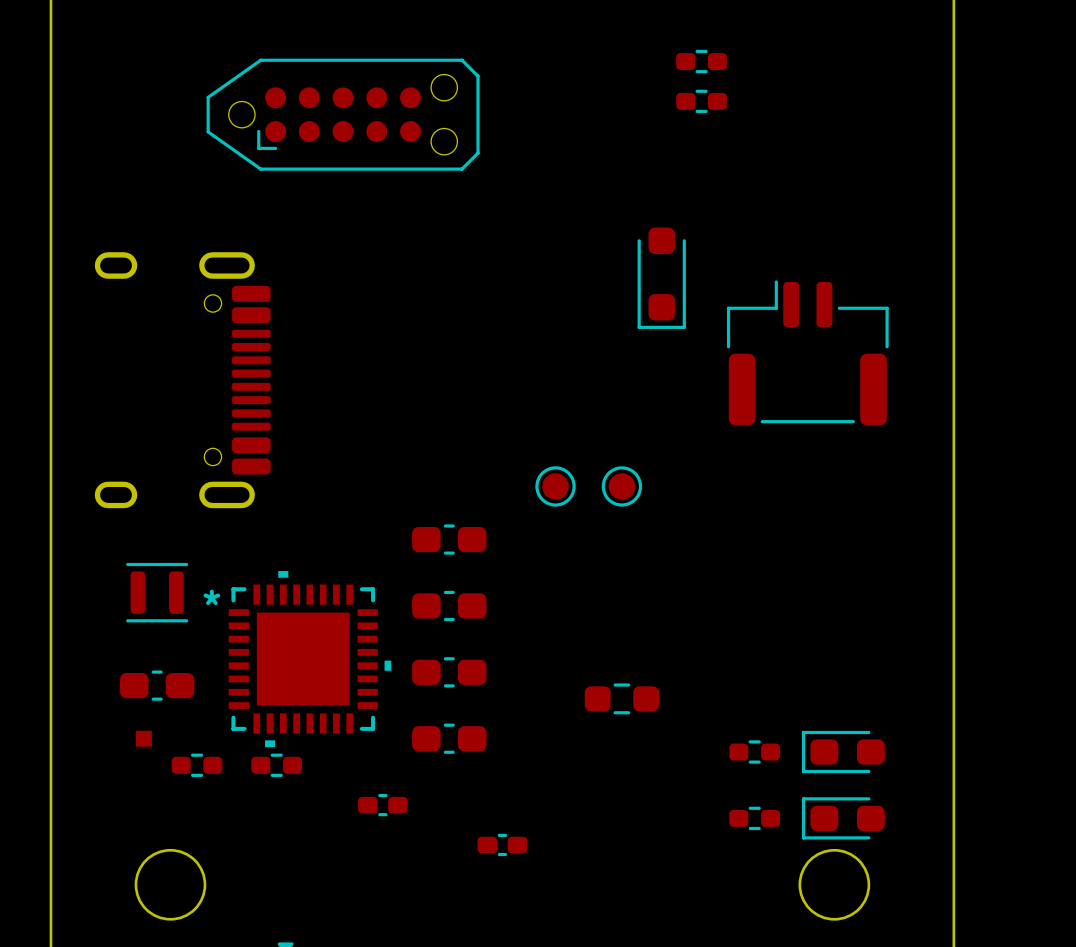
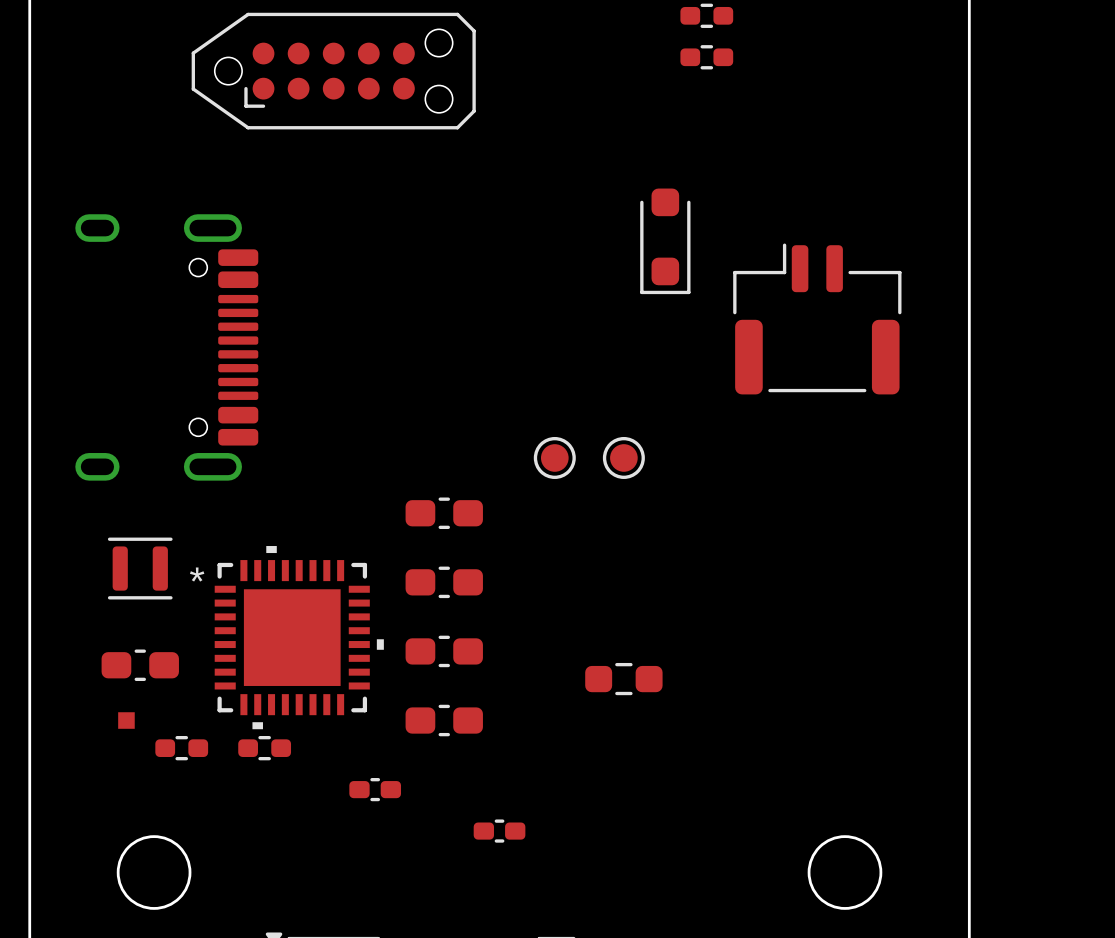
part: (754, 752) -> none
part: (843, 752) -> none
part: (754, 818) -> none
part: (843, 818) -> none

